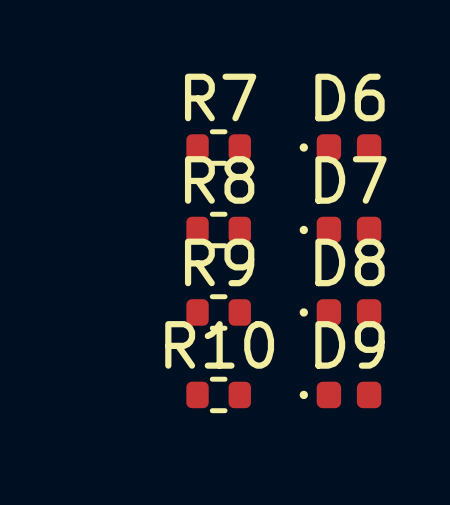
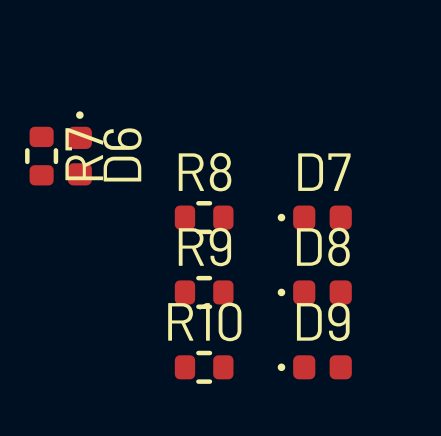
R7 rotation: 0° (218, 147) -> 90° clockwise (41, 156)
R7 position: (218, 147) -> (41, 156)
D6 rotation: 0° (340, 147) -> 90° clockwise (79, 148)
D6 position: (340, 147) -> (79, 148)

